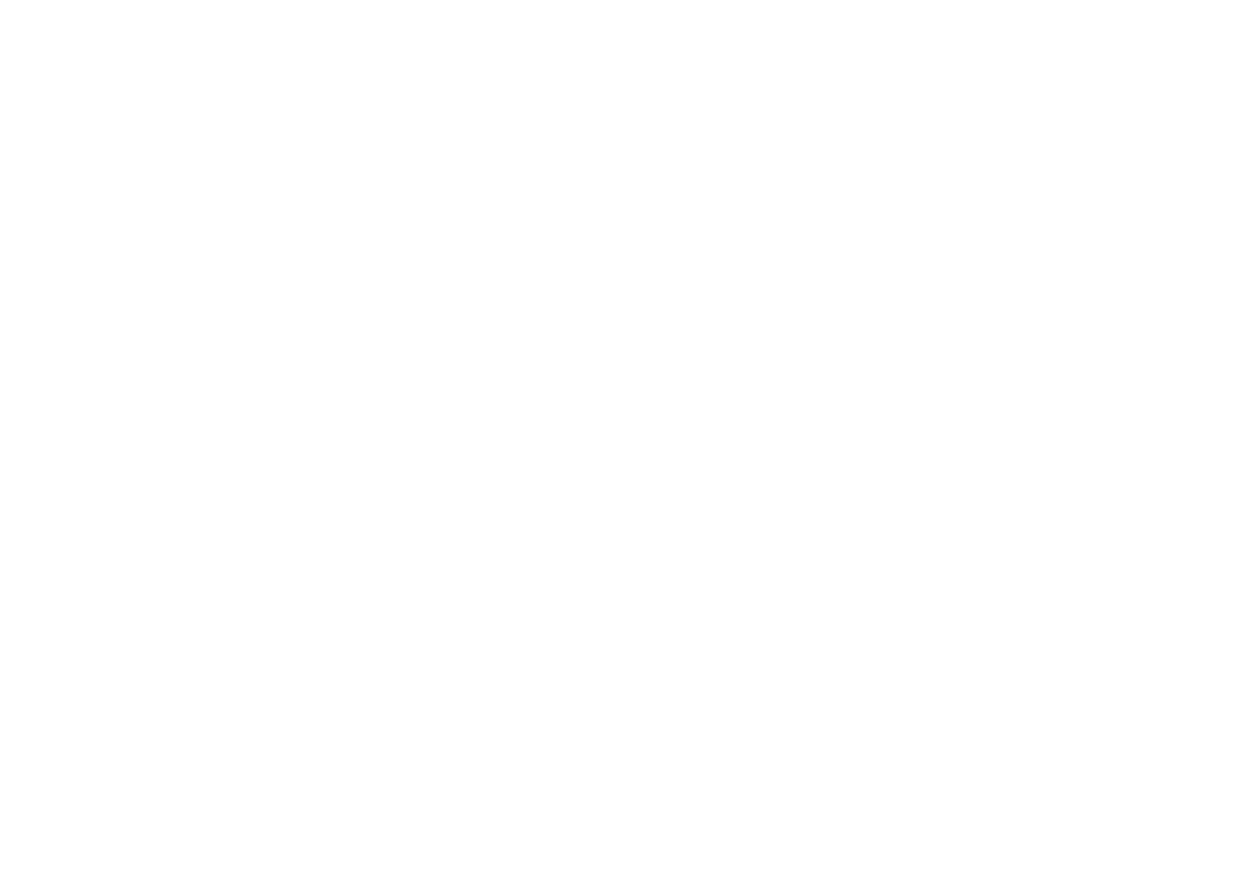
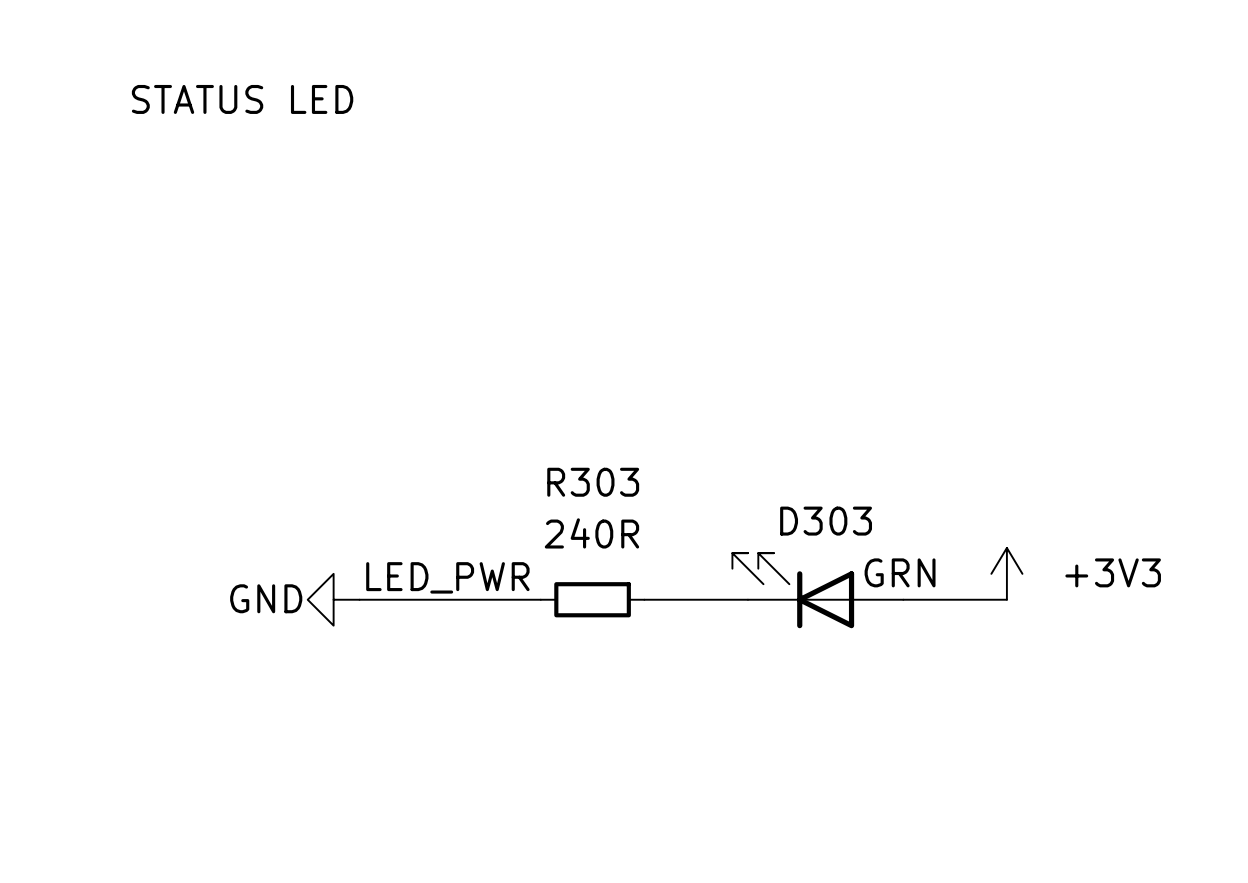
text: none -> STATUS LED (242, 99)
power symbol: none -> +3V3 (1006, 573)
label: none -> LED_PWR (447, 577)
D303: none -> GRN (817, 590)
power symbol: none -> GND (333, 599)
wire: none -> (359, 599) (540, 599)
R303: none -> 240R (592, 599)
wire: none -> (644, 599) (747, 599)
wire: none -> (903, 599) (1006, 599)

